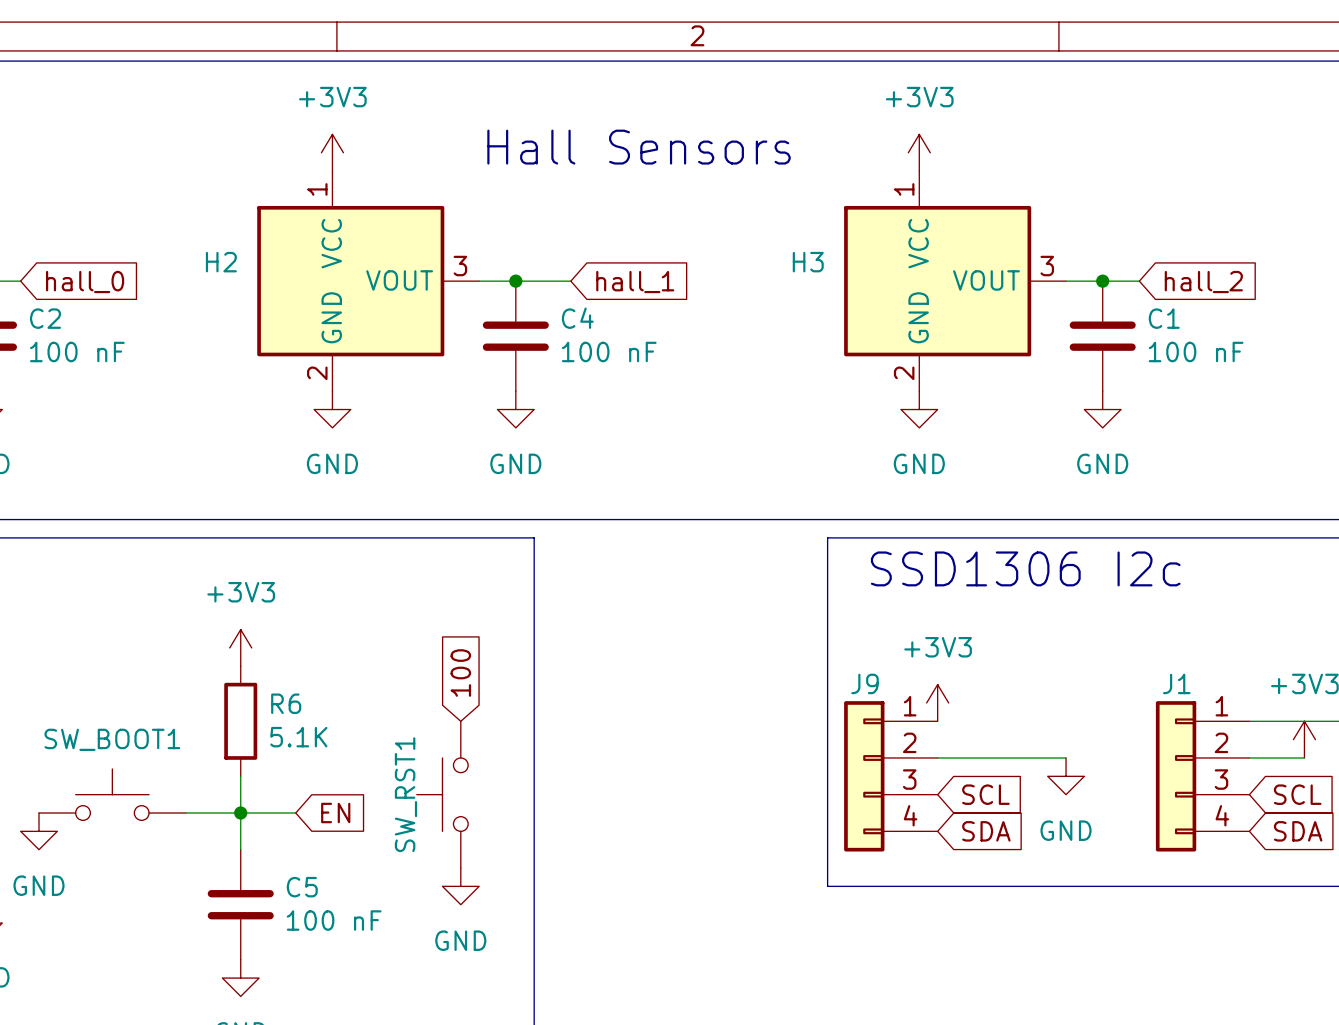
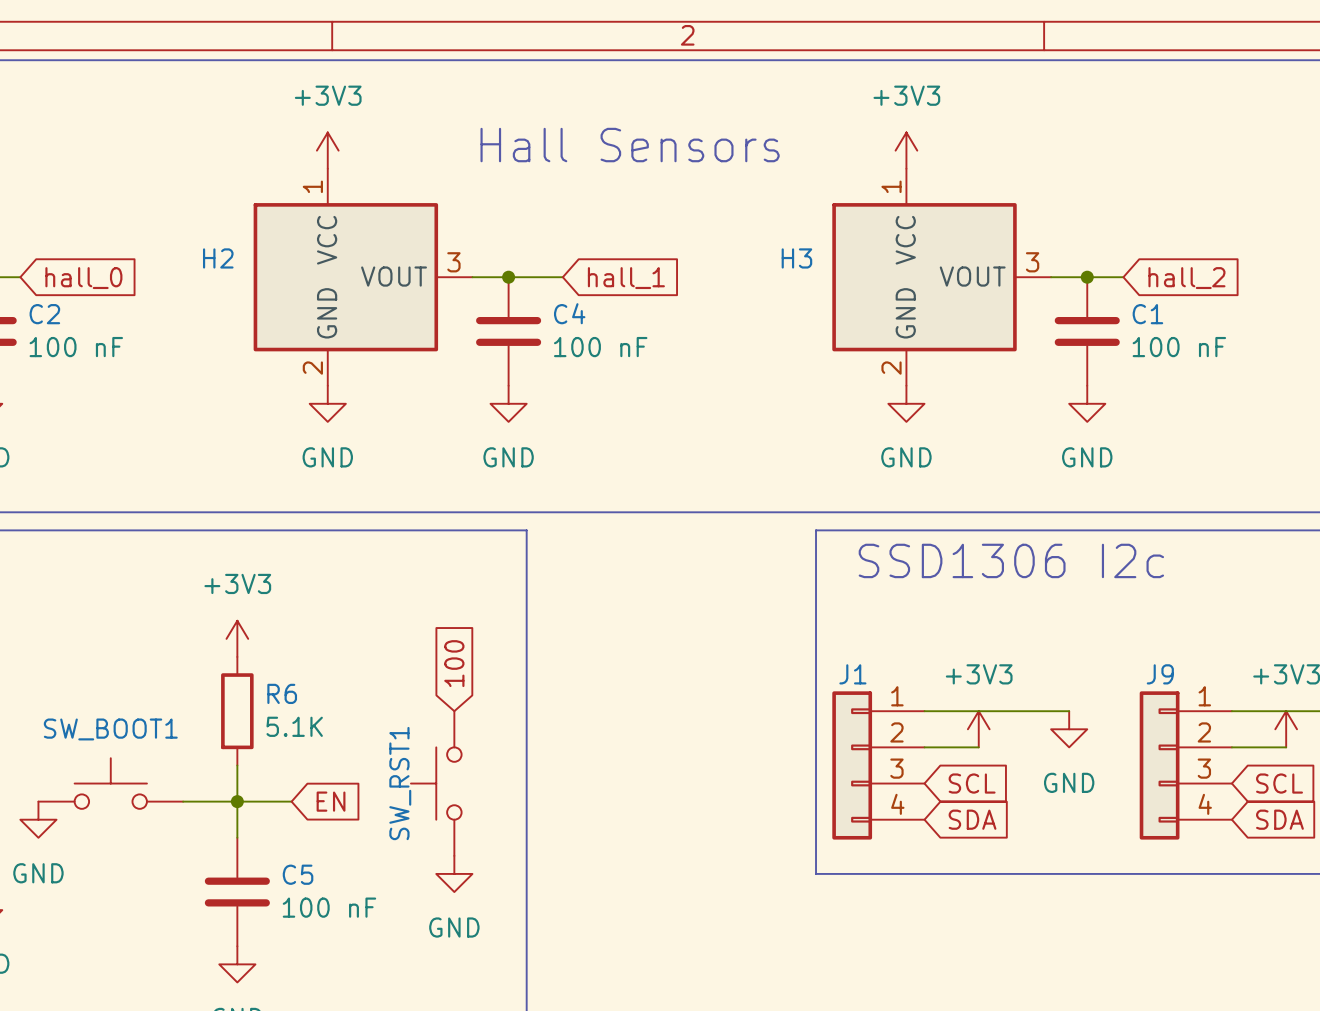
J9 name: J9 (865, 683) -> J1 (852, 674)
J1 name: J1 (1176, 683) -> J9 (1160, 674)
power symbol position: +3V3 (937, 702) -> +3V3 (978, 729)
wire: none -> (924, 711) (1069, 711)
wire: (992, 757) (1066, 757) -> none
power symbol position: GND (1066, 776) -> GND (1069, 729)

